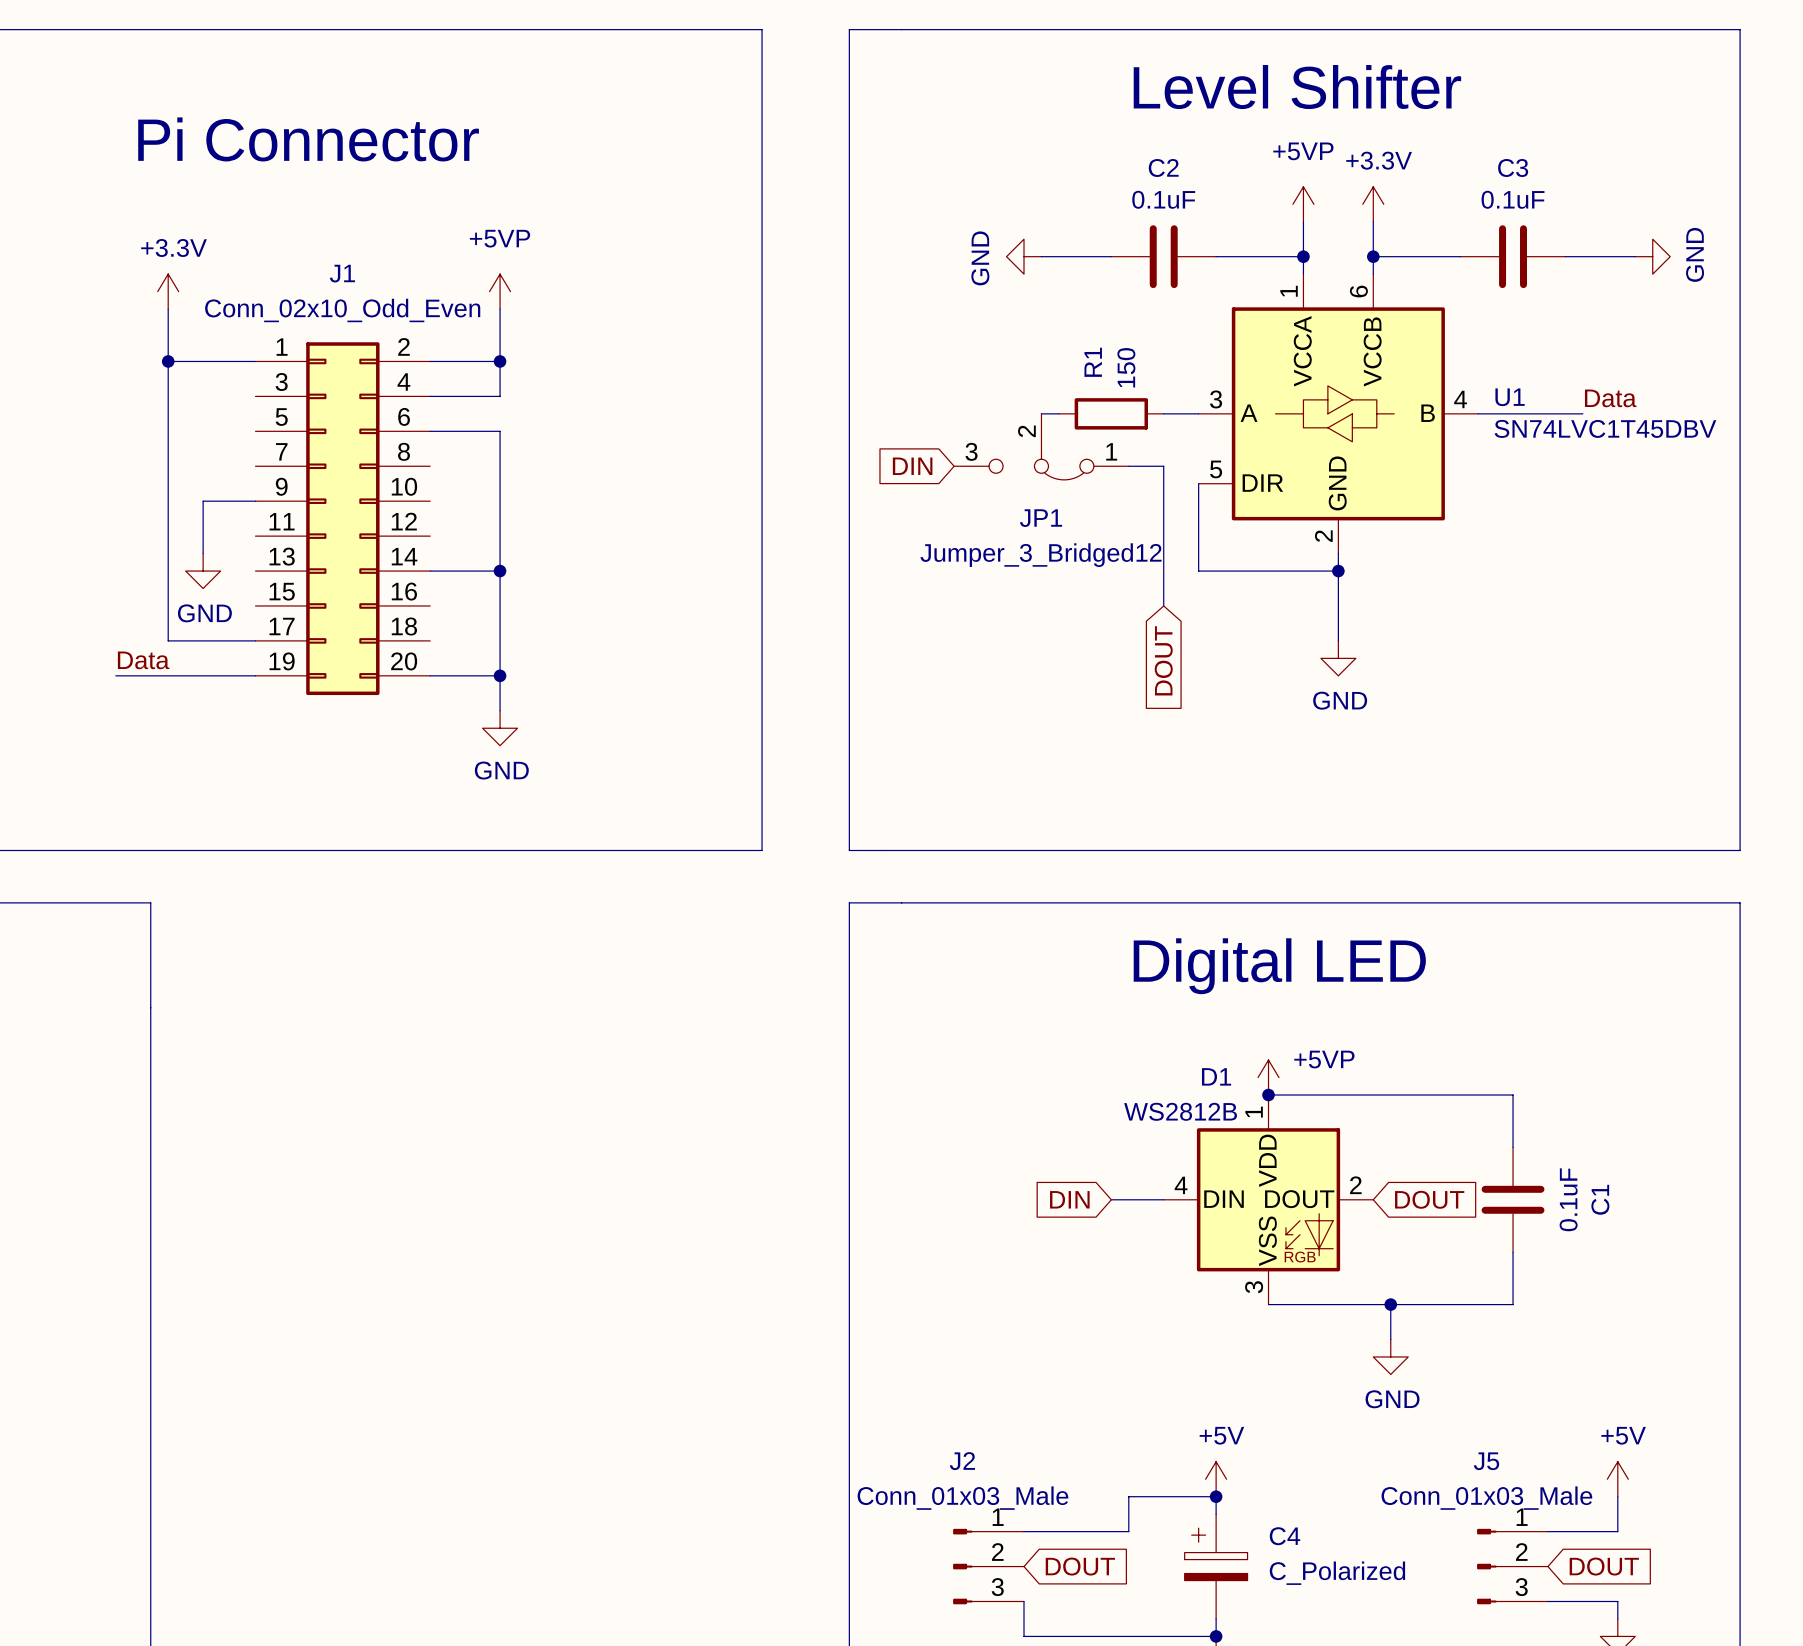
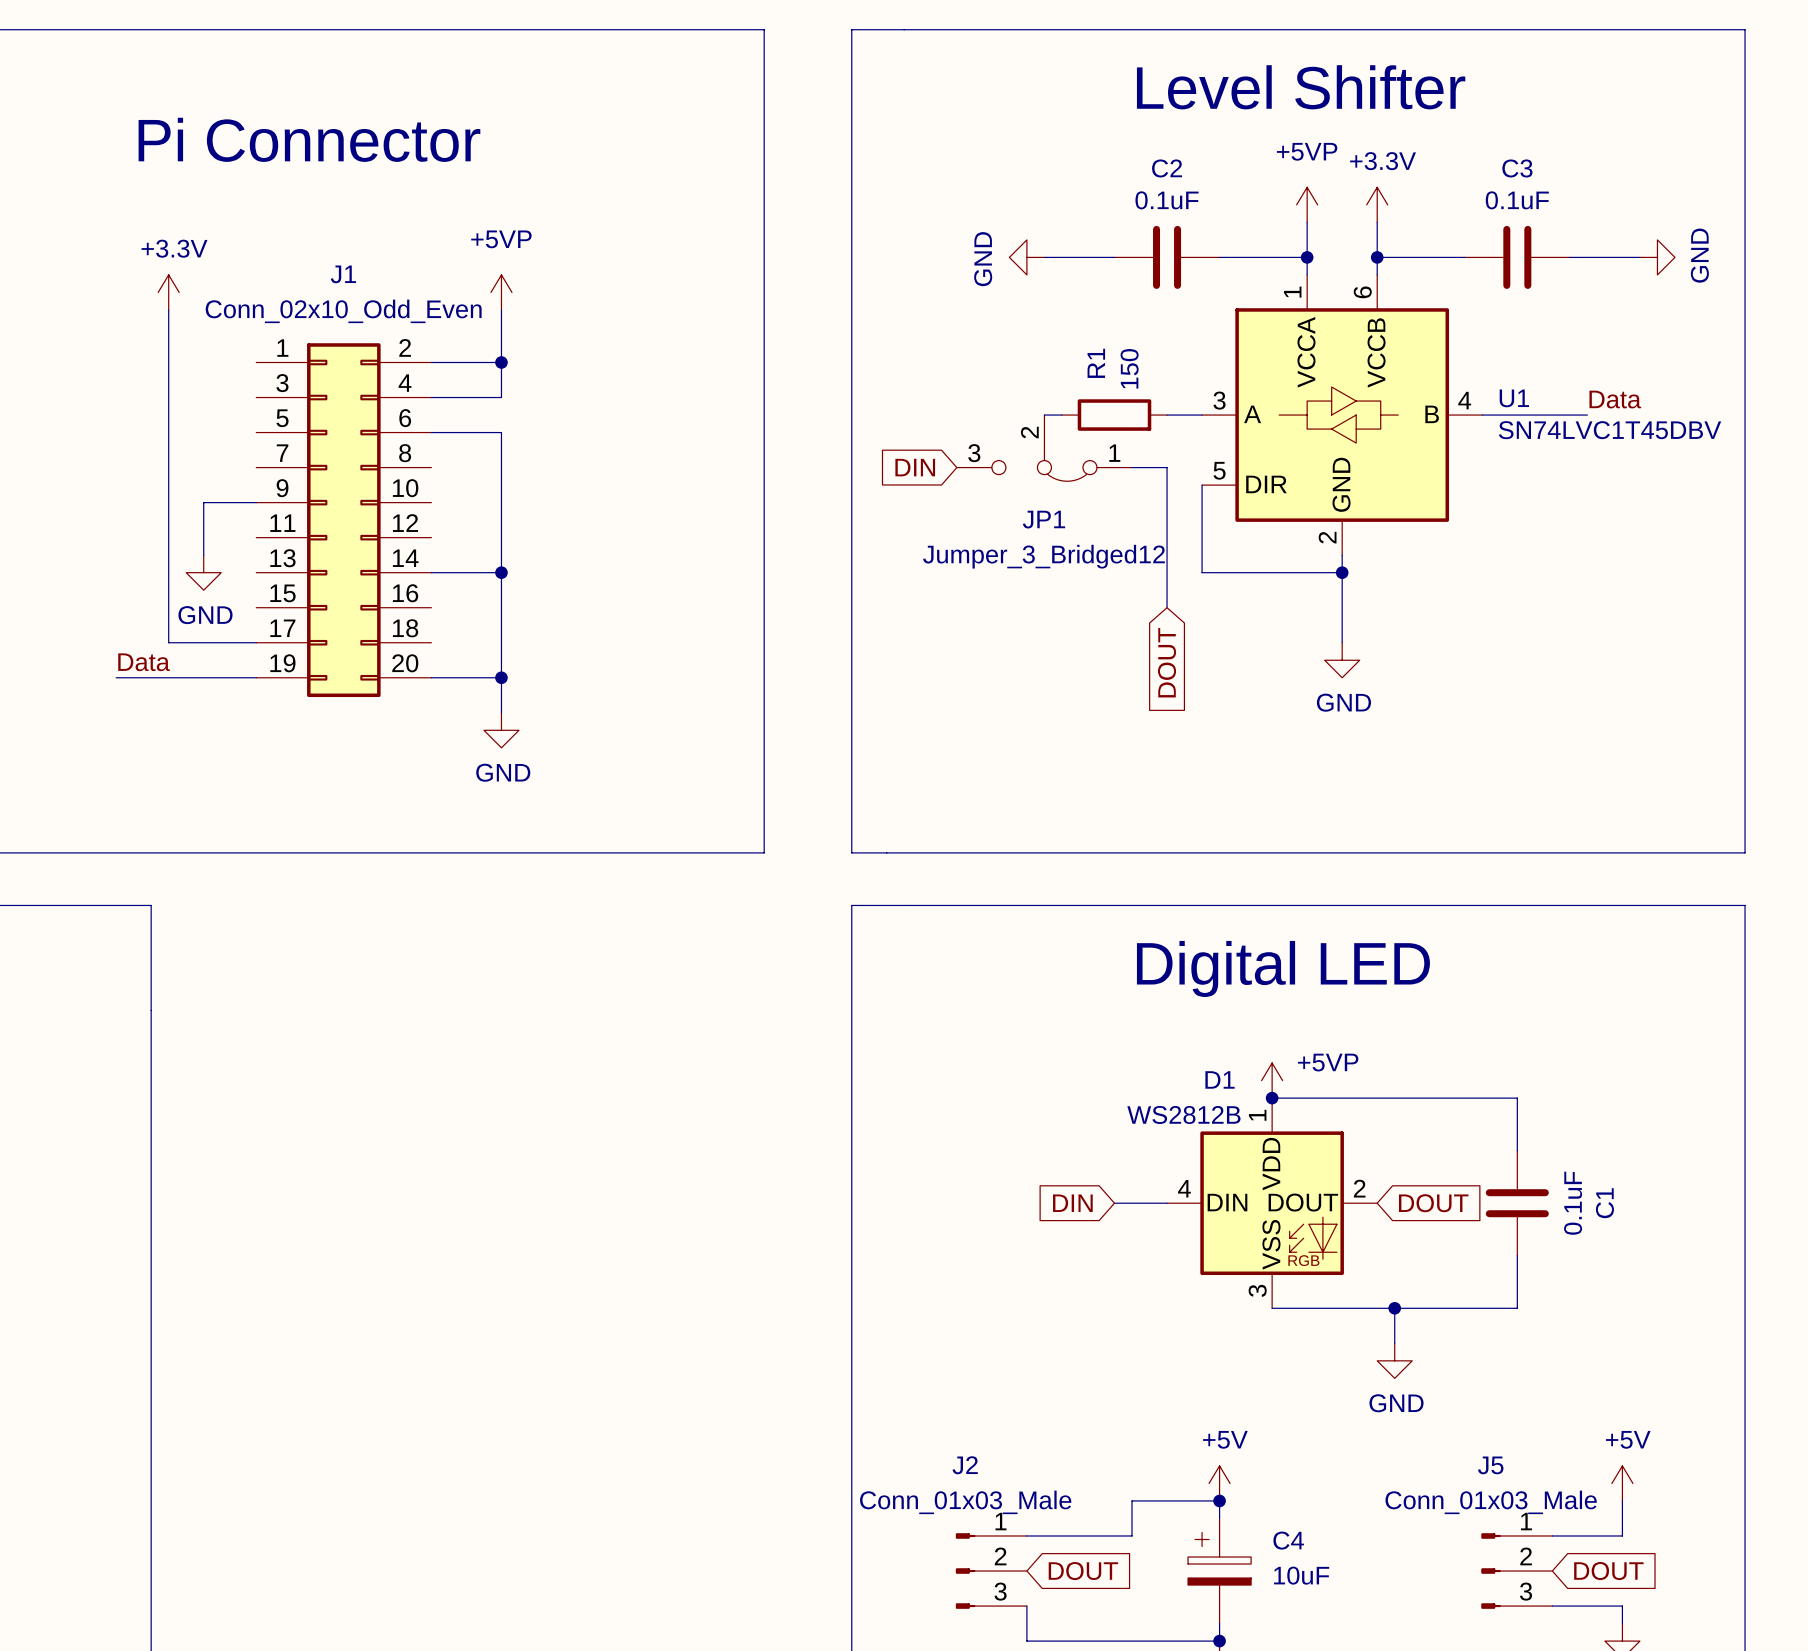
wire: (168, 361) (255, 361) -> none
junction: (168, 361) -> none
C4 value: C_Polarized (1337, 1573) -> 10uF (1301, 1575)

